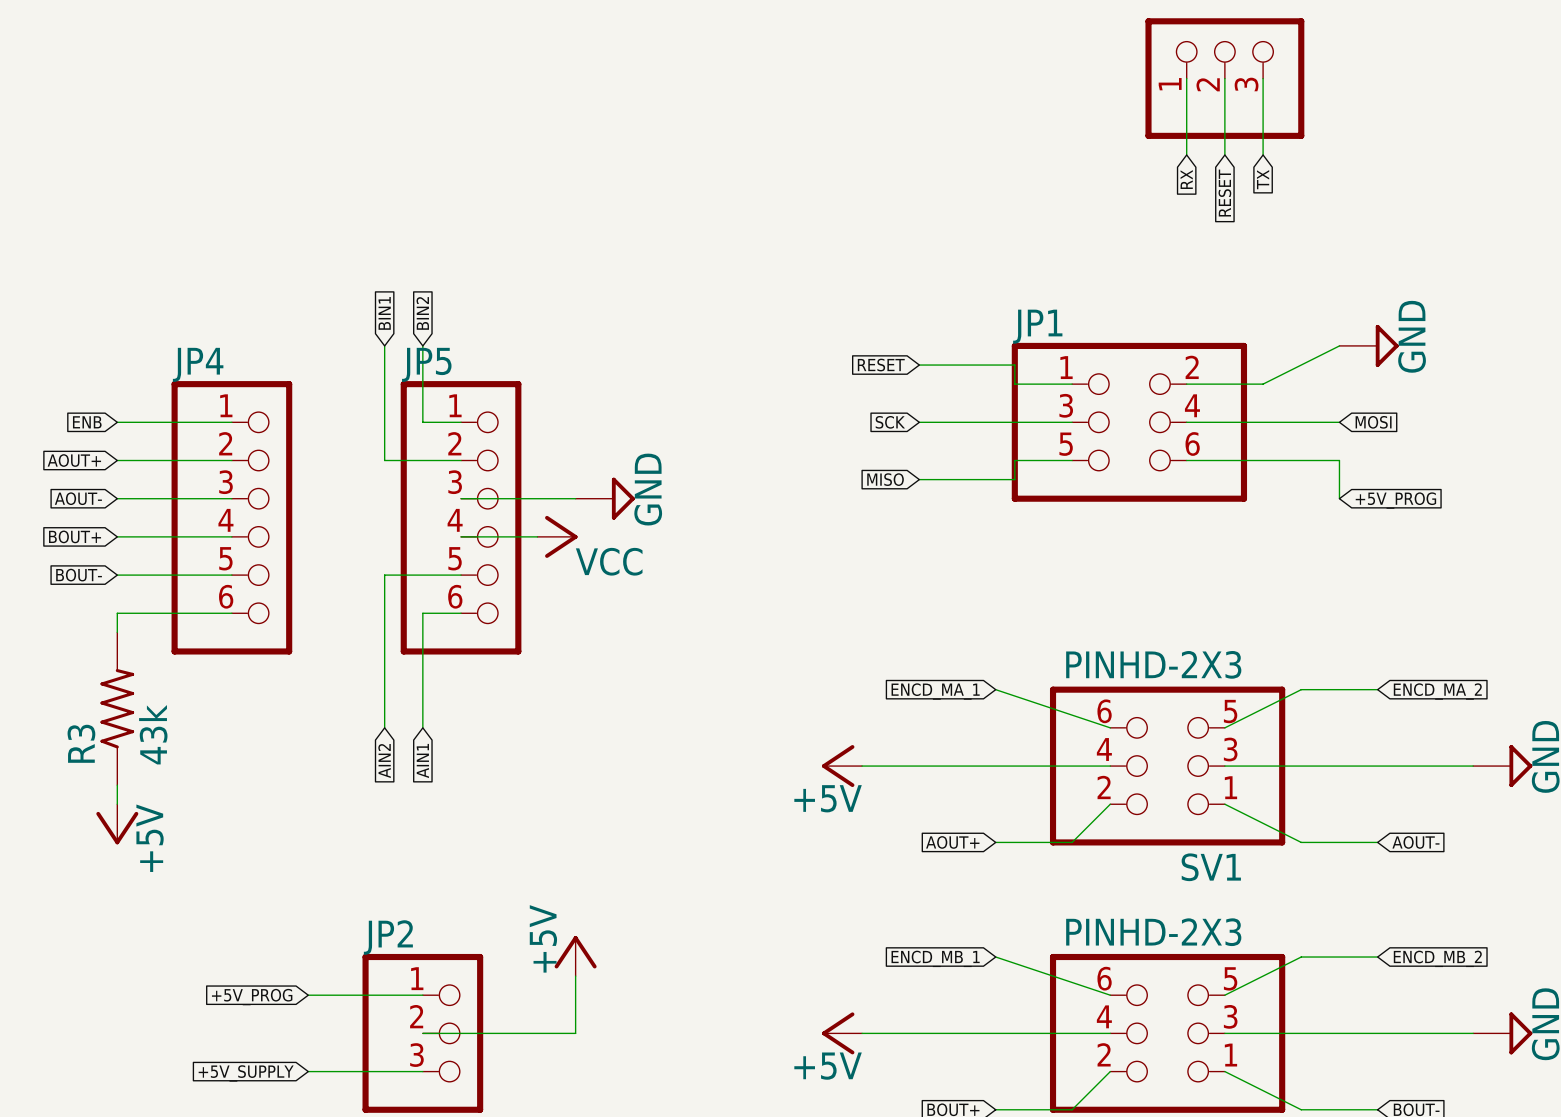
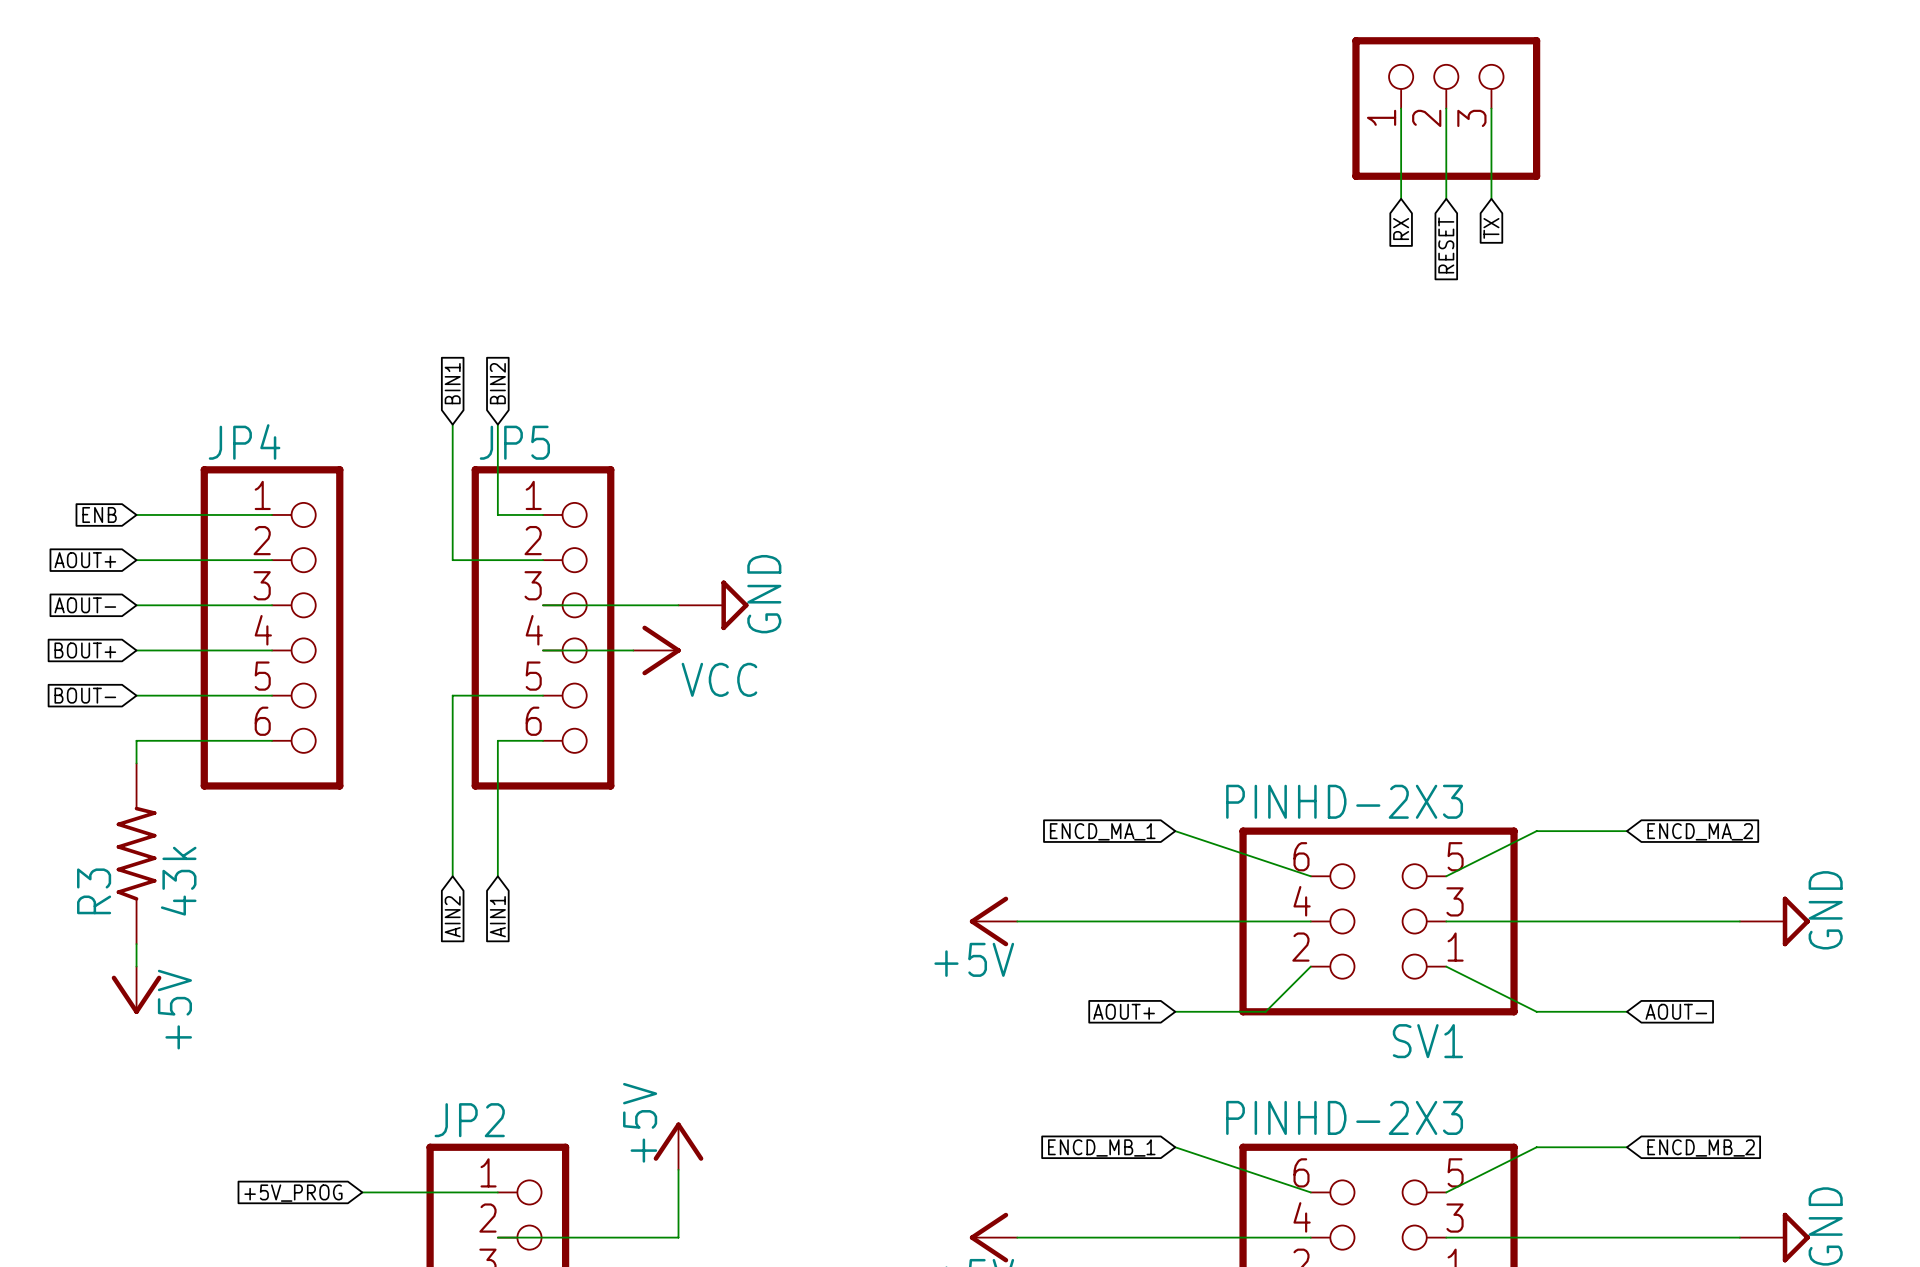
wire: (1339, 345) (1263, 384) (1186, 384) -> none
power symbol: GND (1369, 345) -> none
global label: RESET (881, 365) -> none
wire: (919, 365) (1014, 365) (1014, 384) (1072, 384) -> none
global label: SCK (890, 422) -> none
wire: (919, 422) (1072, 422) -> none
JP1: (1129, 422) -> none
wire: (1186, 422) (1339, 422) -> none
global label: MOSI (1373, 422) -> none
wire: (1072, 460) (1014, 460) (1014, 479) (919, 479) -> none
wire: (1186, 460) (1339, 460) (1339, 498) -> none
global label: MISO (885, 479) -> none
global label: +5V_PROG (1395, 500) -> none

